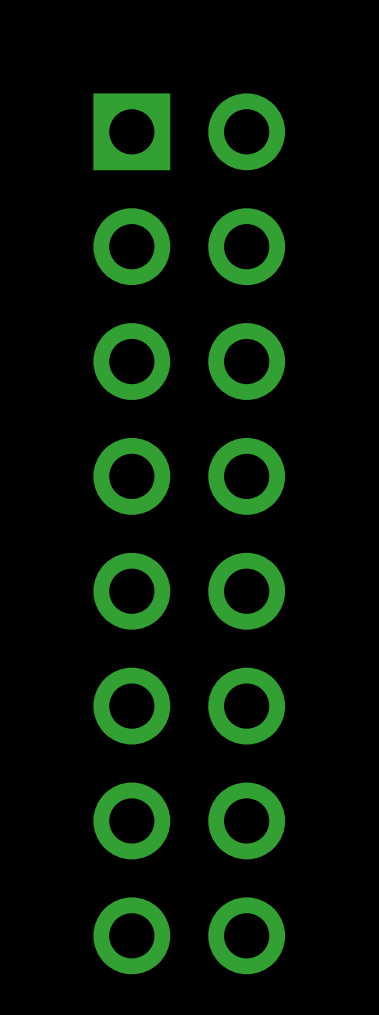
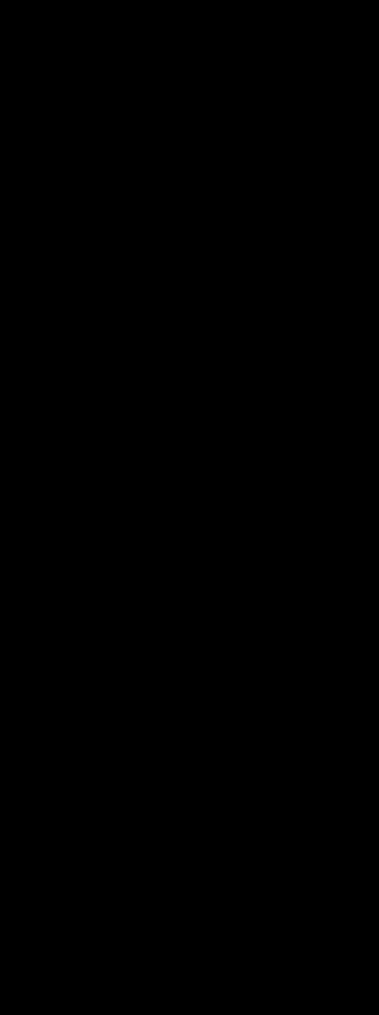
part: (189, 533) -> none

